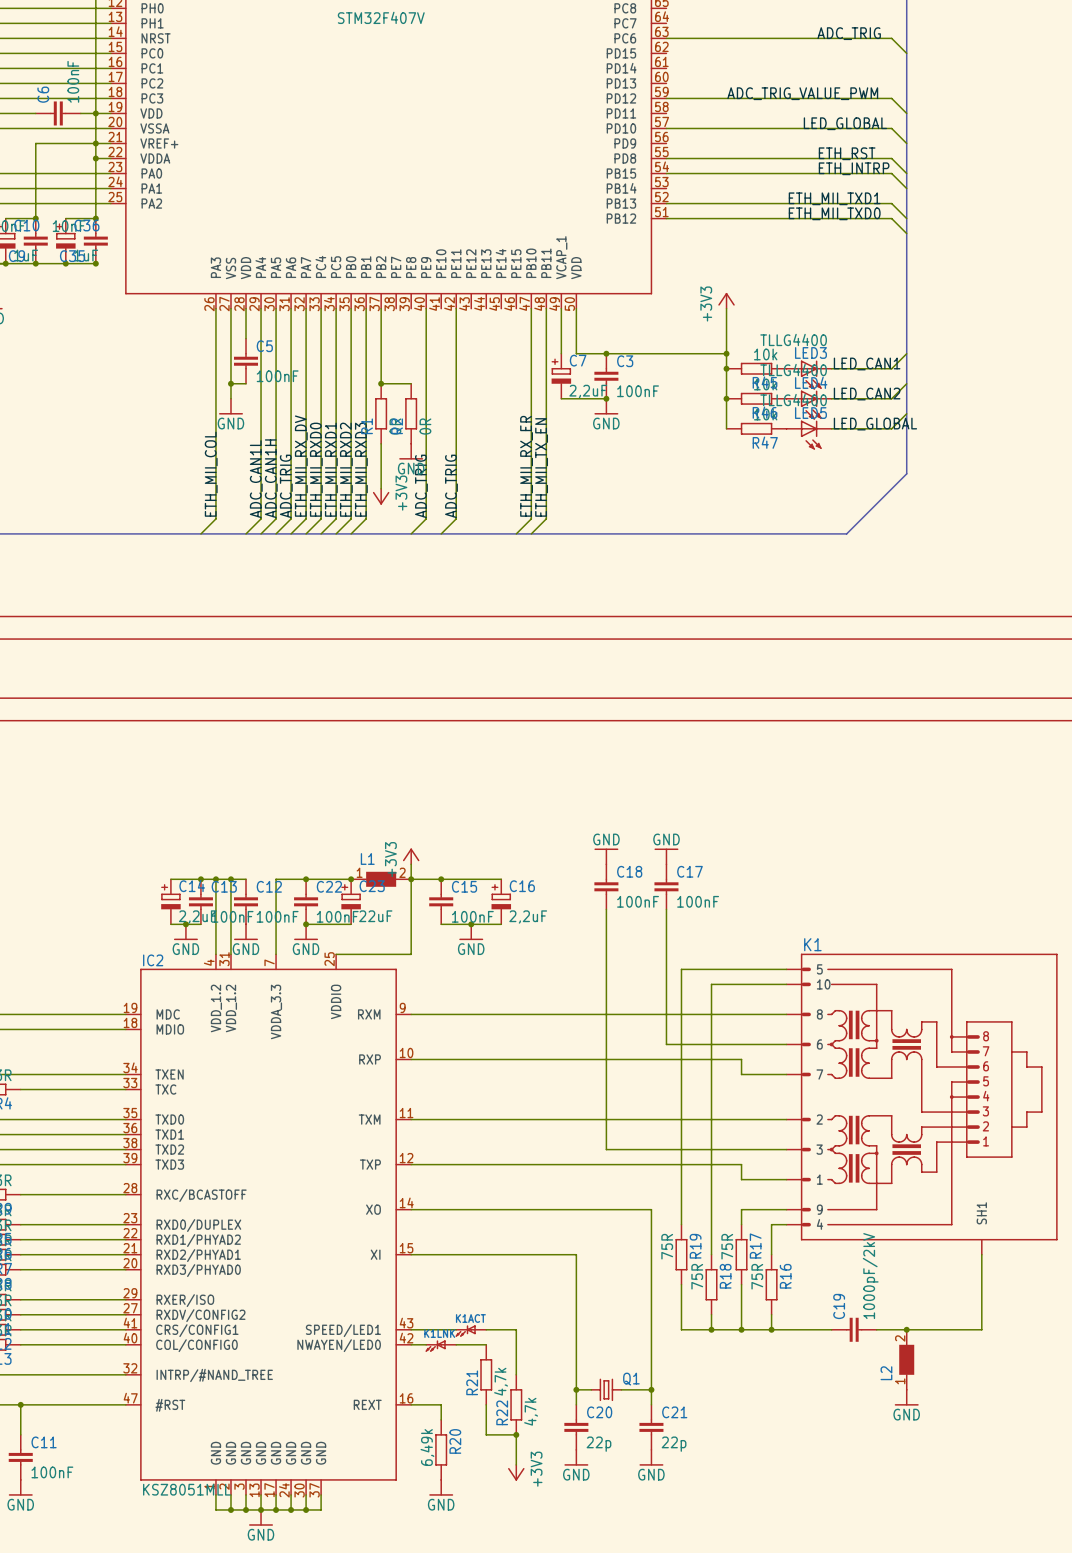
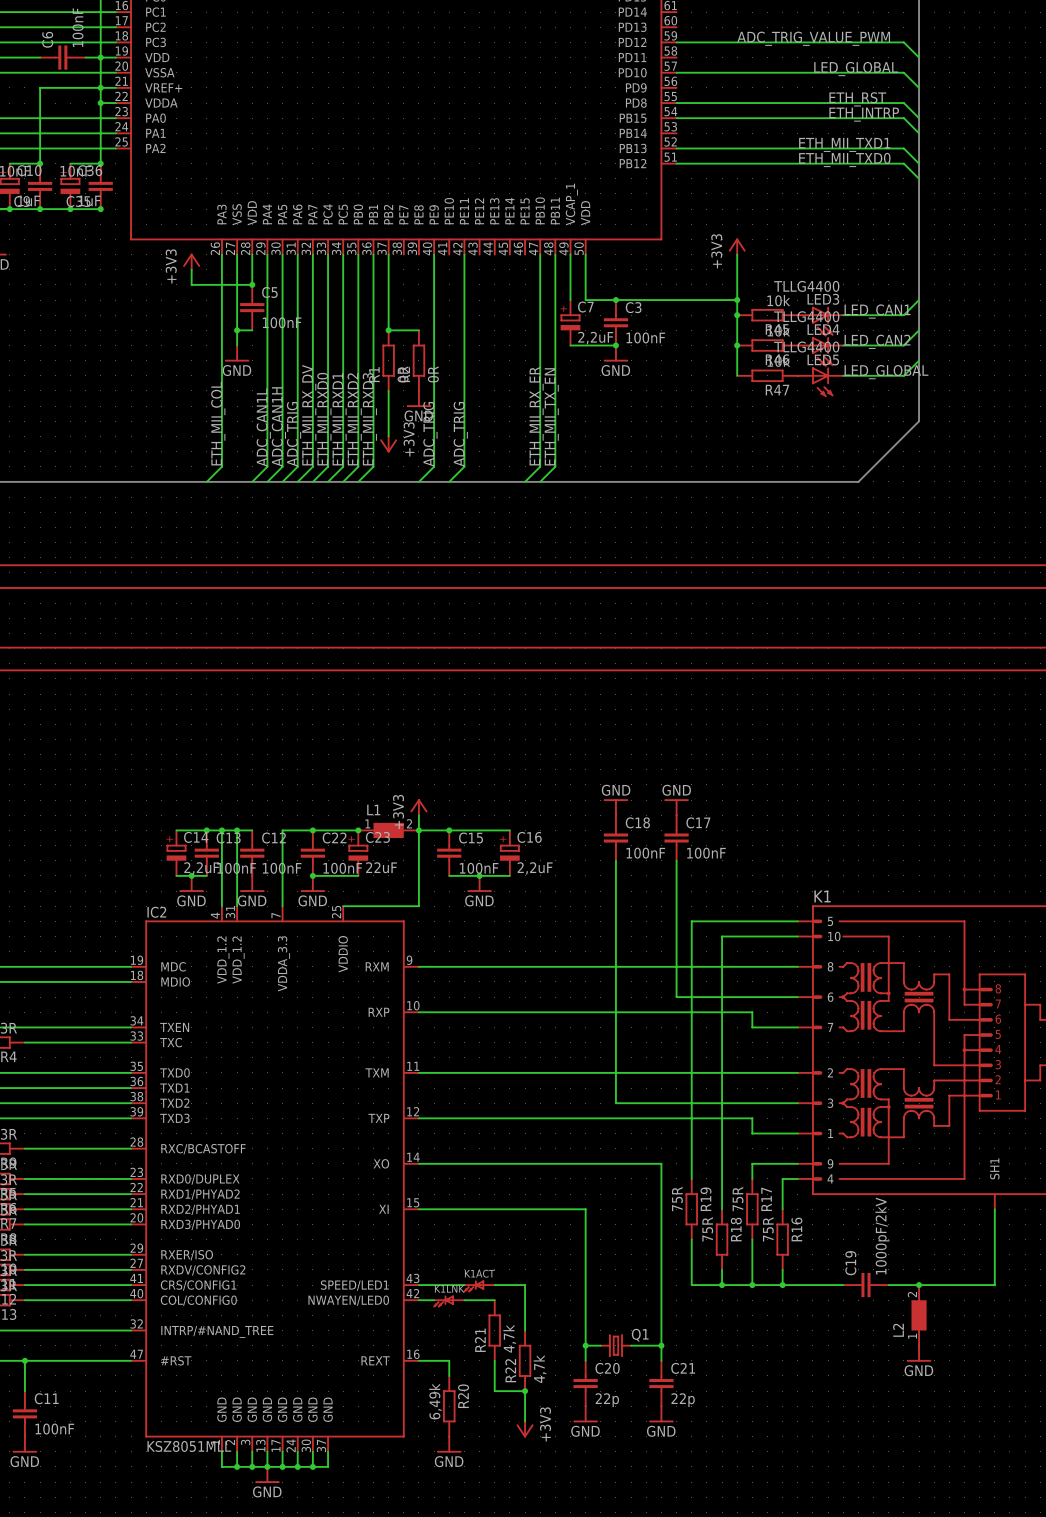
power symbol: none -> +3V3 (191, 261)
wire: none -> (191, 269) (191, 284) (252, 284)
junction: none -> (252, 284)

